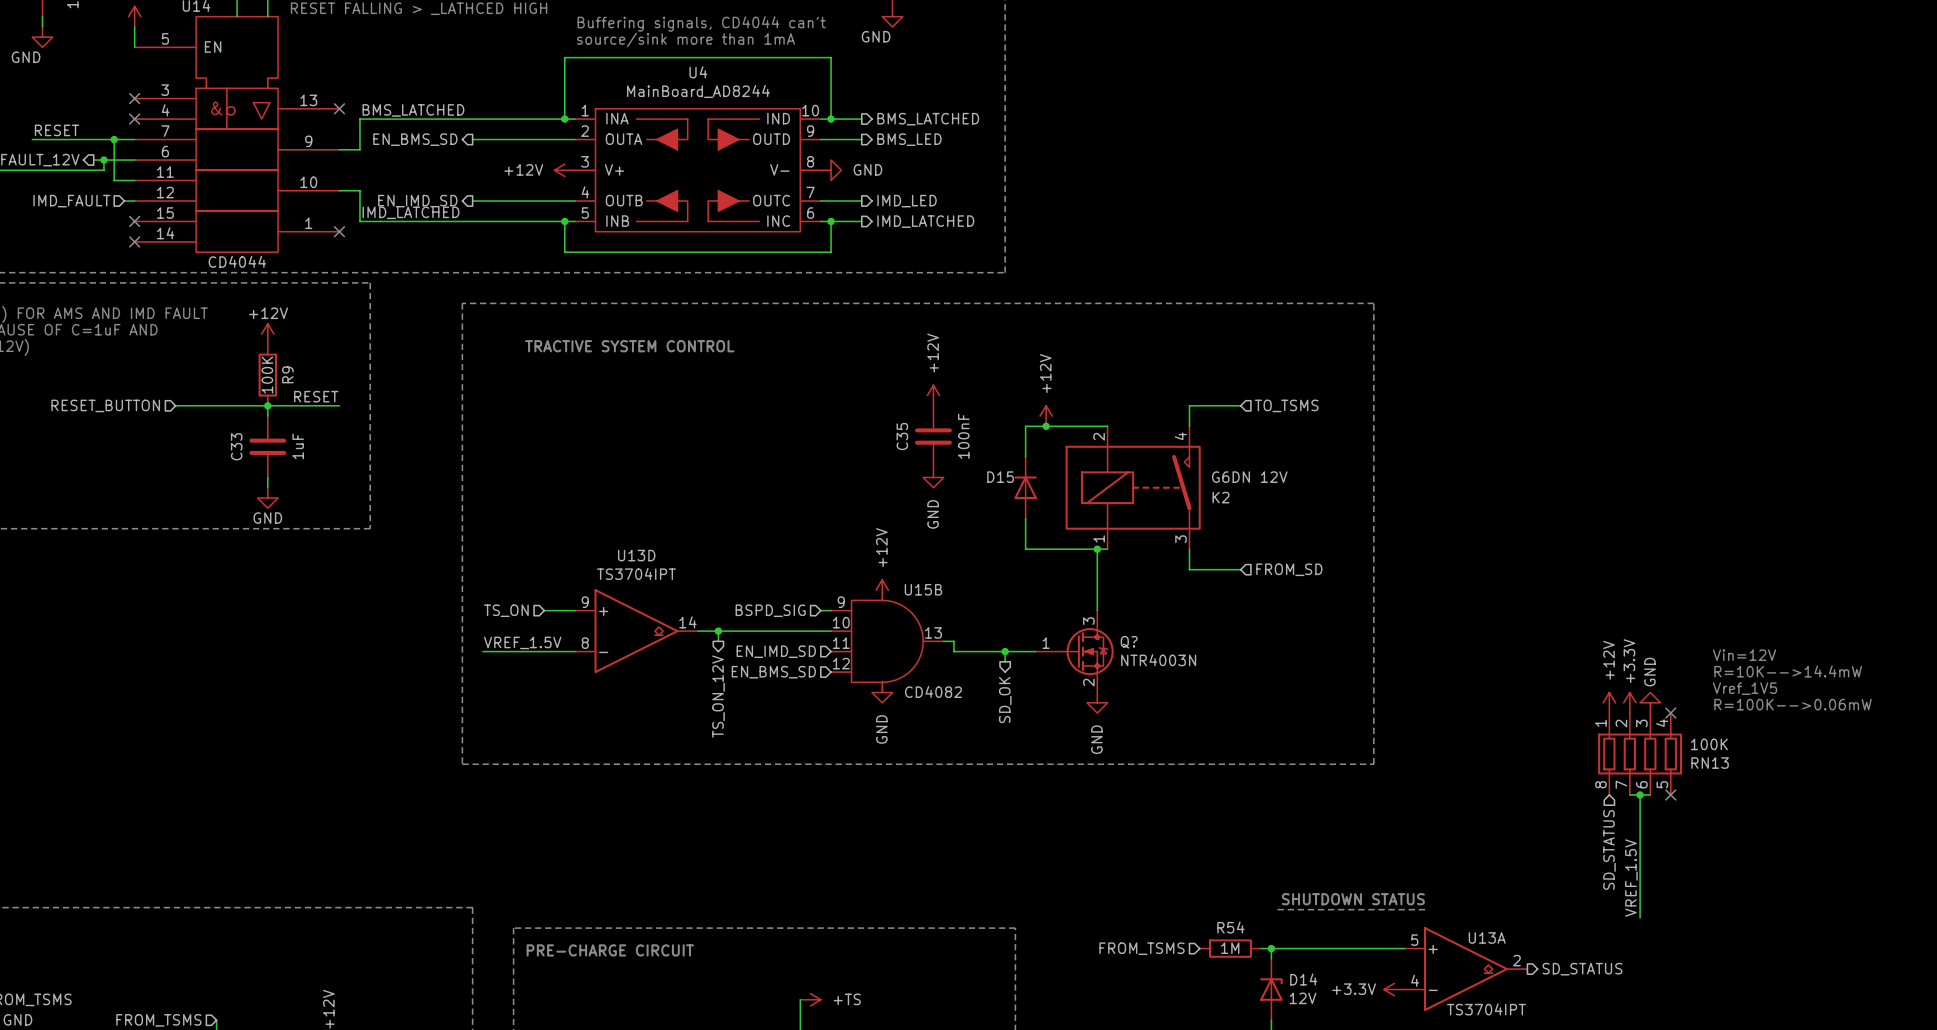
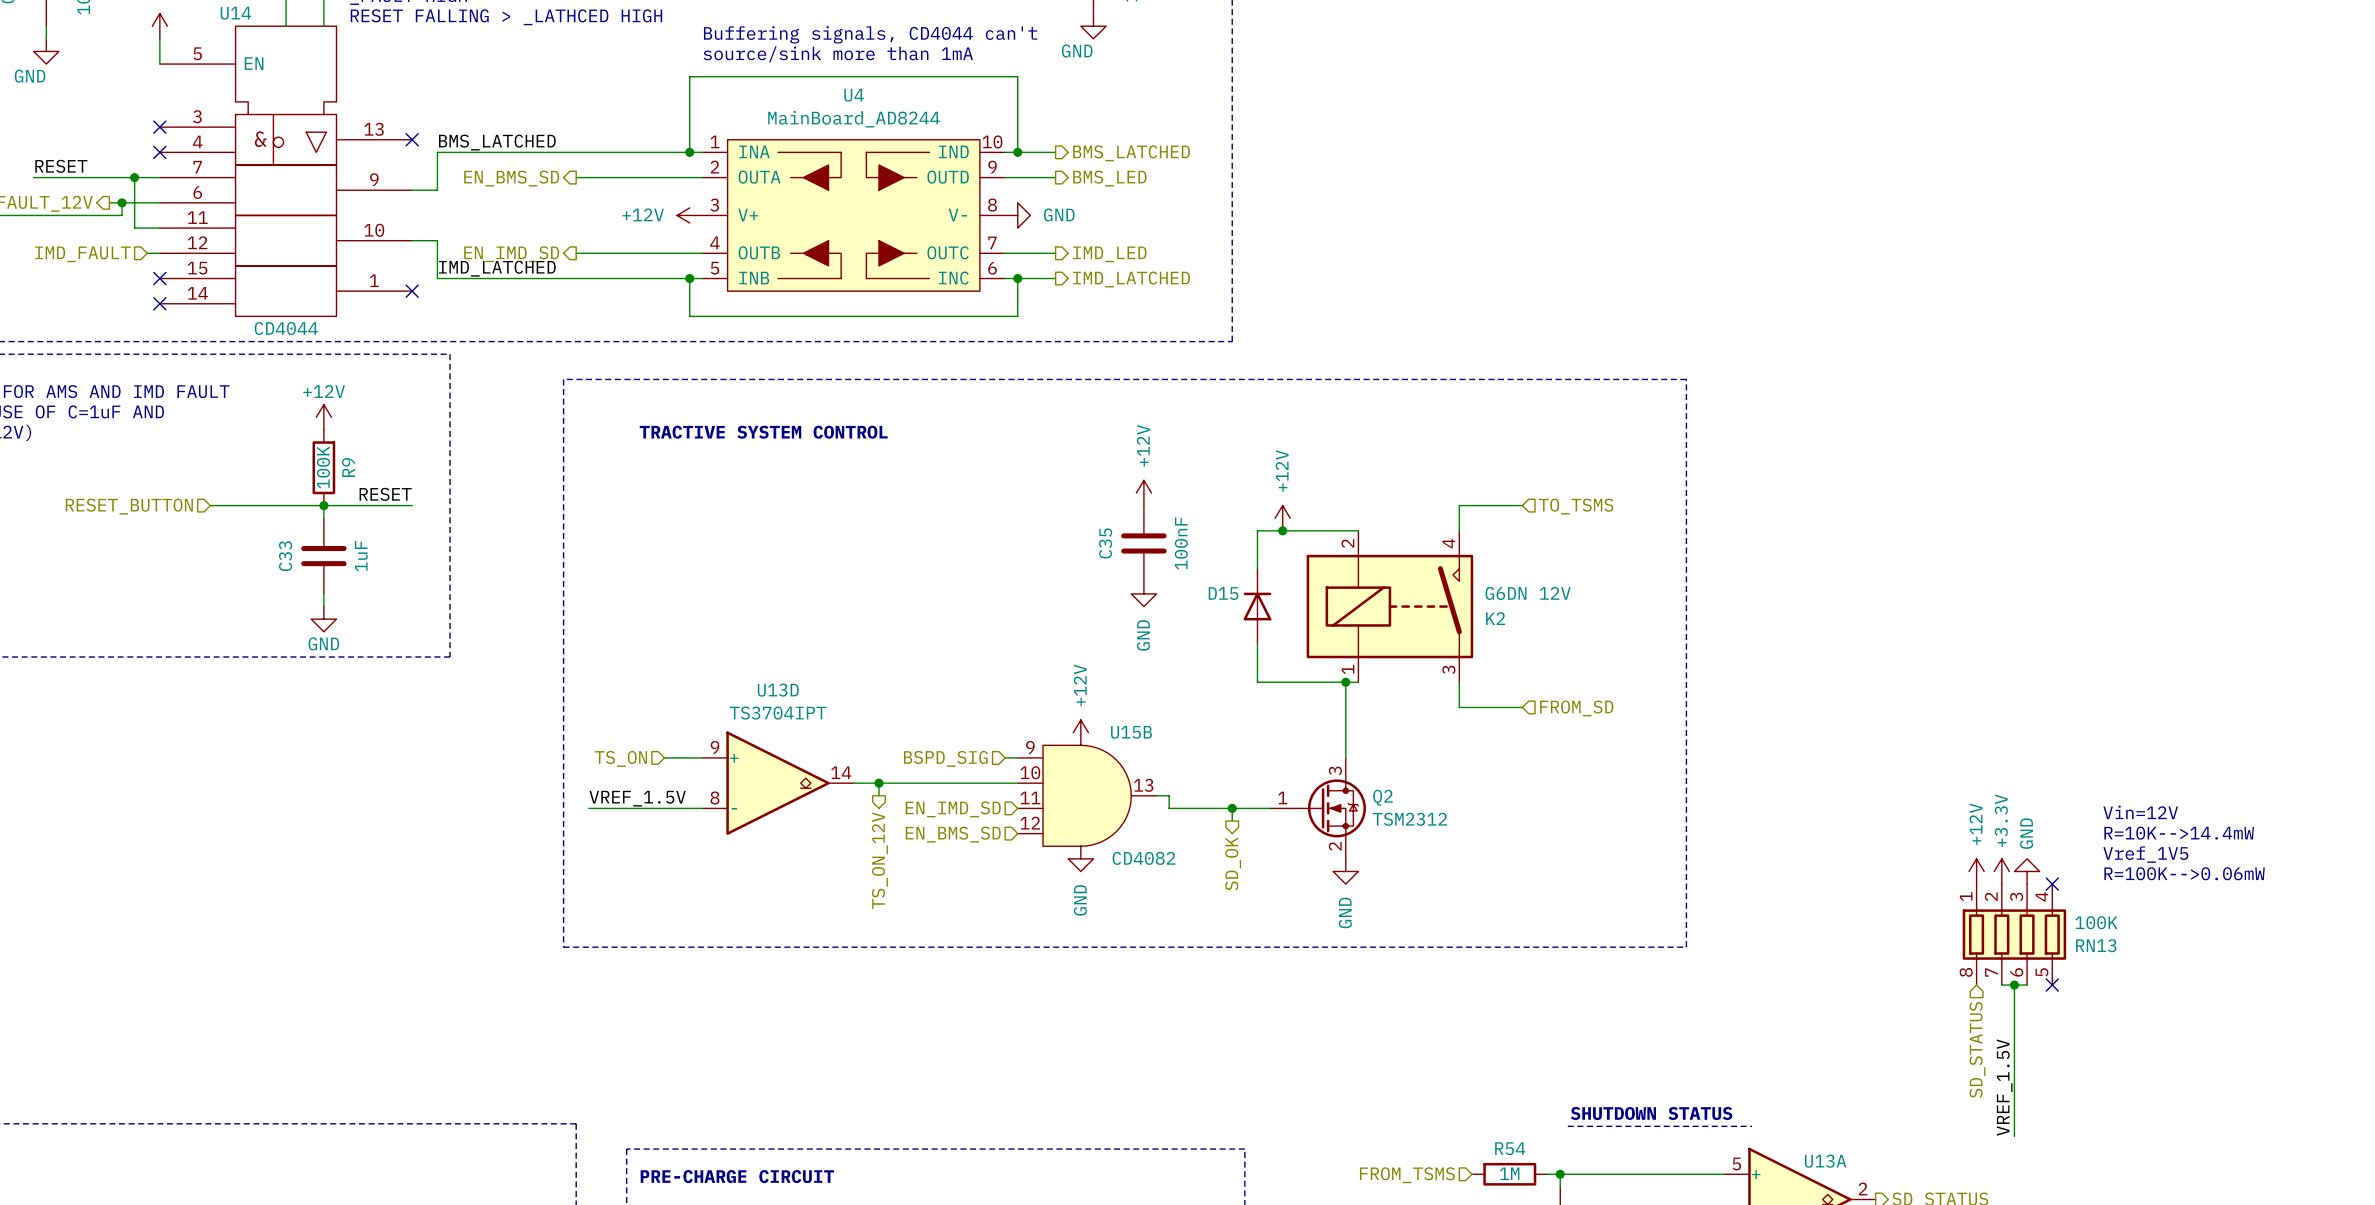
Q? name: Q? (1129, 642) -> Q2 (1383, 797)
Q? value: NTR4003N (1158, 660) -> TSM2312 (1409, 819)

